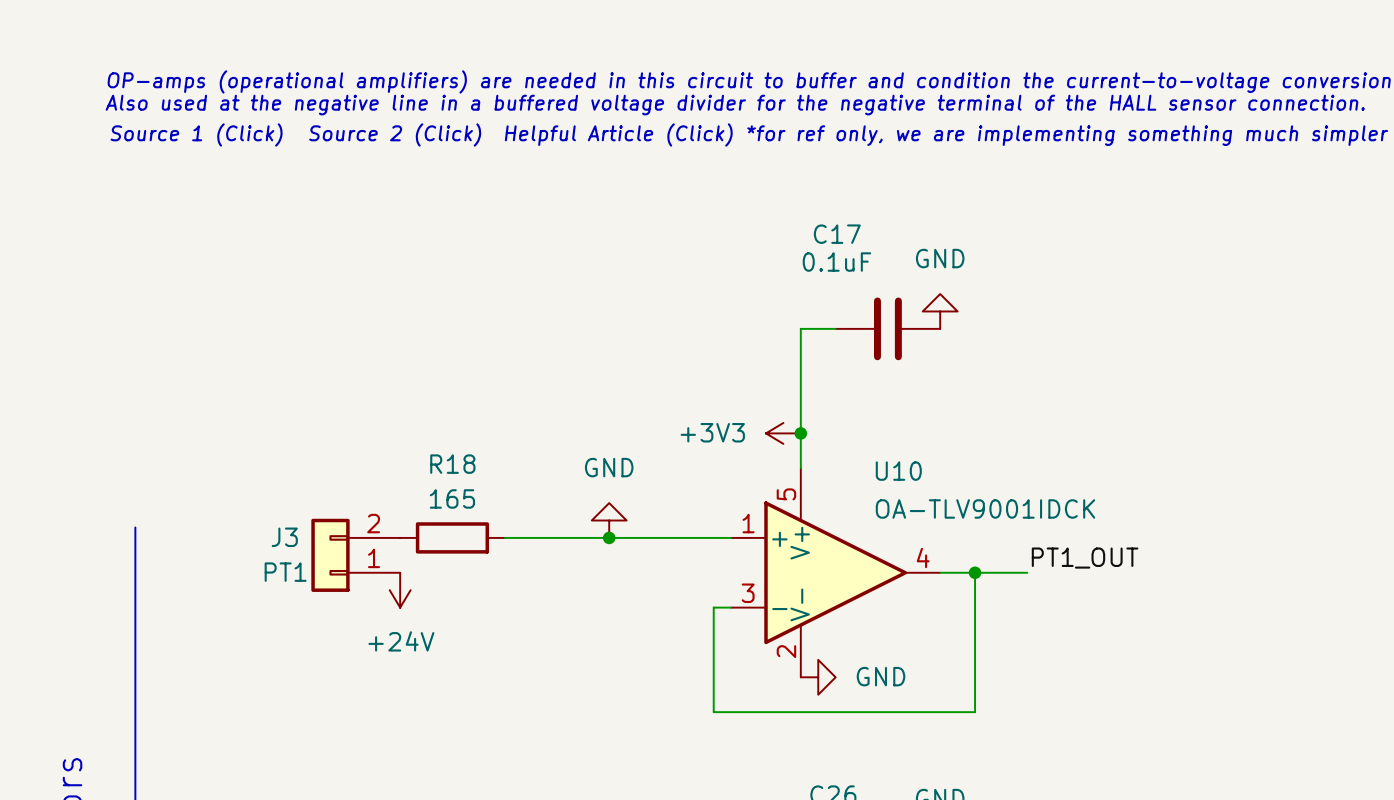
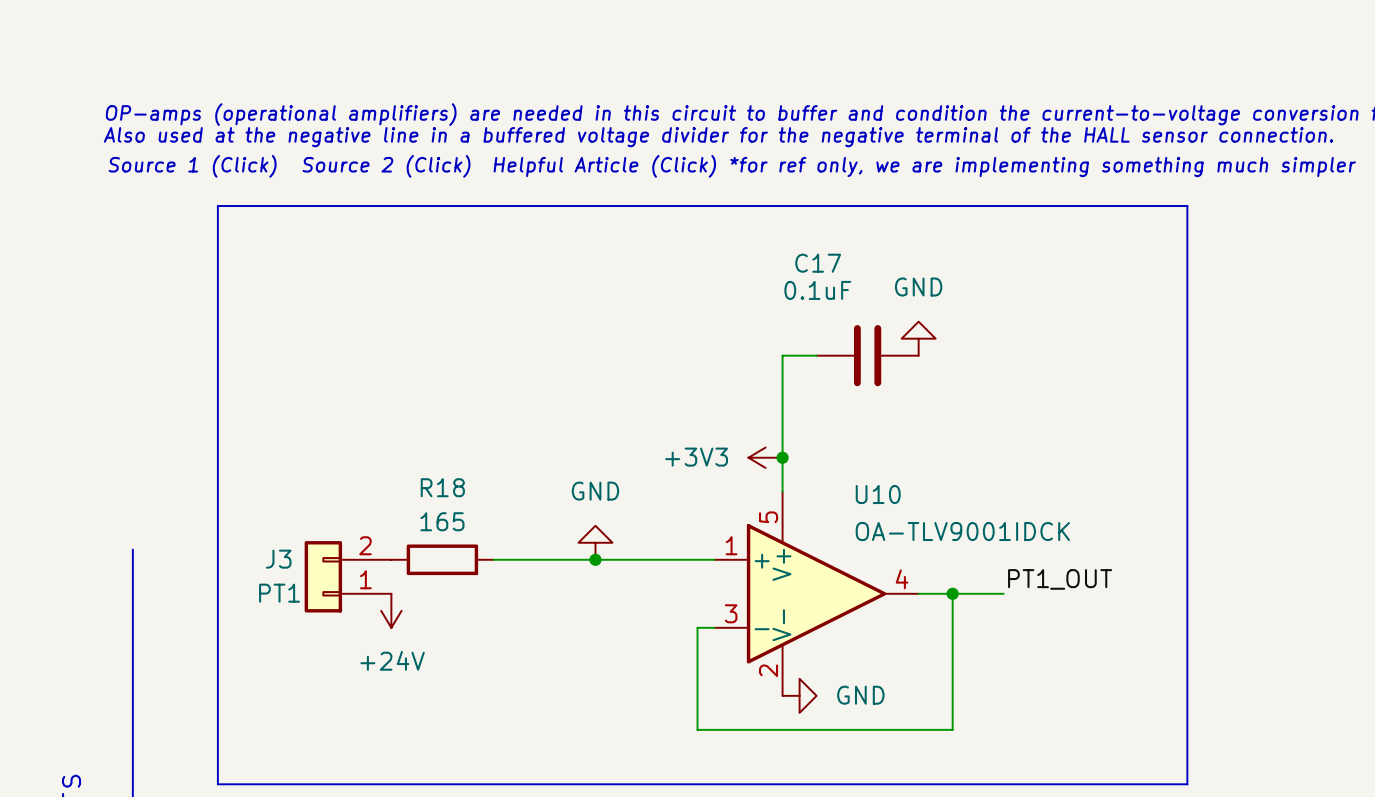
line: none -> (217, 206) (1187, 206) (1187, 784) (217, 784) (217, 206)

